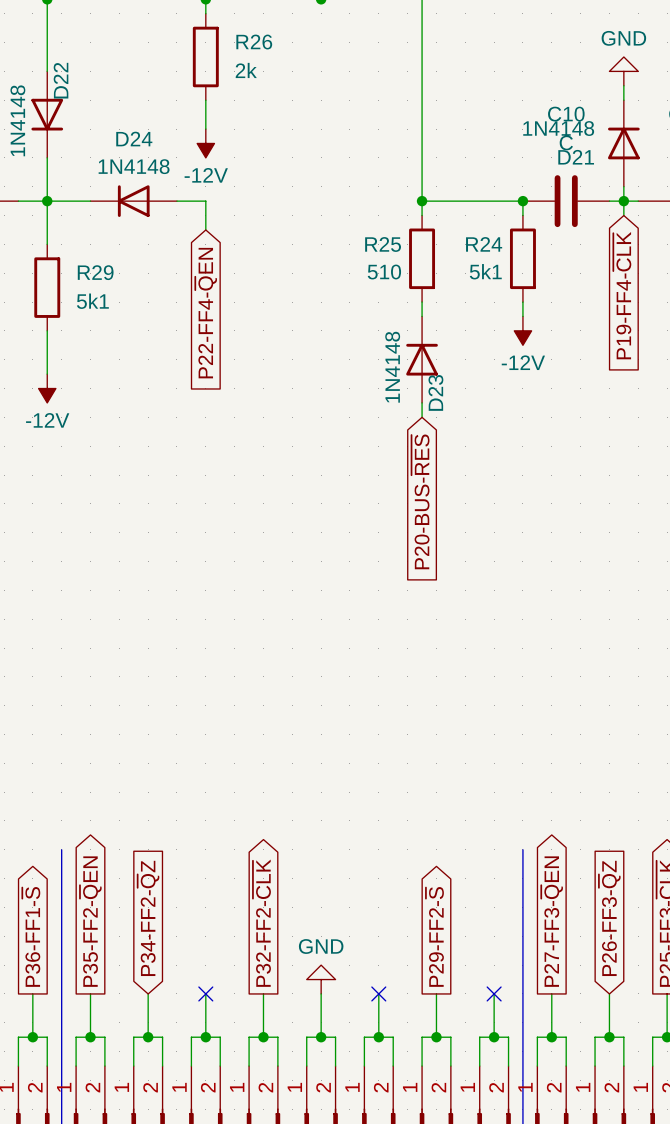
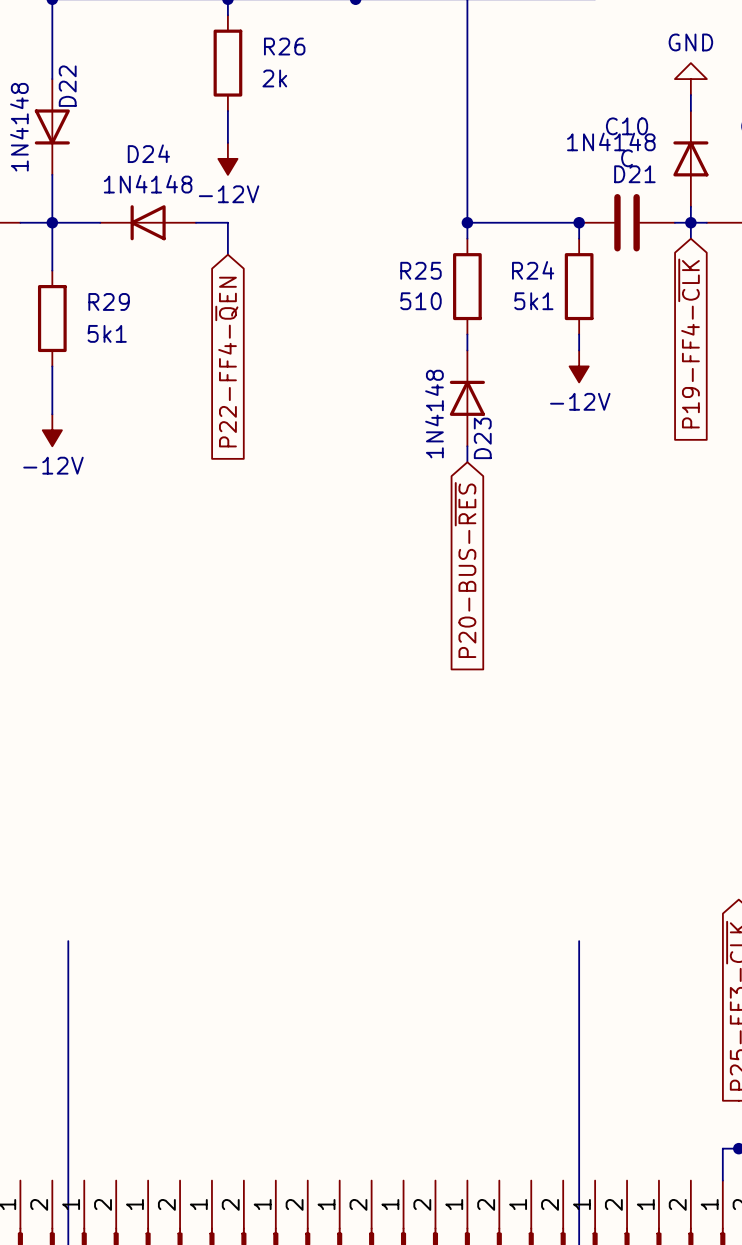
global label: P34-FF2-~{Q}Z (148, 918) -> none
global label: P26-FF3-~{Q}Z (609, 918) -> none
global label: P35-FF2-~{Q}EN (90, 921) -> none
global label: P27-FF3-~{Q}EN (552, 921) -> none
global label: P32-FF2-~{CLK} (261, 923) -> none
global label: P36-FF1-~{S} (31, 936) -> none
global label: P29-FF2-~{S} (434, 936) -> none
power symbol: GND (321, 979) -> none
wire: (32, 993) (32, 1037) -> none
wire: (90, 993) (90, 1037) -> none
wire: (148, 993) (148, 1037) -> none
wire: (205, 993) (205, 1037) -> none
no-connect mark: (205, 993) -> none
wire: (263, 993) (263, 1037) -> none
wire: (321, 993) (321, 1037) -> none
wire: (378, 993) (378, 1037) -> none
no-connect mark: (378, 993) -> none
wire: (436, 993) (436, 1037) -> none
wire: (494, 993) (494, 1037) -> none
no-connect mark: (494, 993) -> none
wire: (551, 993) (551, 1037) -> none
wire: (609, 993) (609, 1037) -> none
wire: (667, 993) (667, 1037) -> none
junction: (32, 1037) -> none
junction: (90, 1037) -> none
junction: (148, 1037) -> none
junction: (205, 1037) -> none
junction: (263, 1037) -> none
junction: (321, 1037) -> none
junction: (378, 1037) -> none
junction: (436, 1037) -> none
junction: (494, 1037) -> none
junction: (551, 1037) -> none
junction: (609, 1037) -> none
wire: (18, 1066) (18, 1037) (47, 1037) (47, 1066) -> none
wire: (76, 1066) (76, 1037) (104, 1037) (104, 1066) -> none
wire: (133, 1066) (133, 1037) (162, 1037) (162, 1066) -> none
wire: (191, 1066) (191, 1037) (220, 1037) (220, 1066) -> none
wire: (249, 1066) (249, 1037) (277, 1037) (277, 1066) -> none
wire: (306, 1066) (306, 1037) (335, 1037) (335, 1066) -> none
wire: (364, 1066) (364, 1037) (393, 1037) (393, 1066) -> none
wire: (422, 1066) (422, 1037) (450, 1037) (450, 1066) -> none
wire: (479, 1066) (479, 1037) (508, 1037) (508, 1066) -> none
wire: (537, 1066) (537, 1037) (566, 1037) (566, 1066) -> none
wire: (595, 1066) (595, 1037) (623, 1037) (623, 1066) -> none

